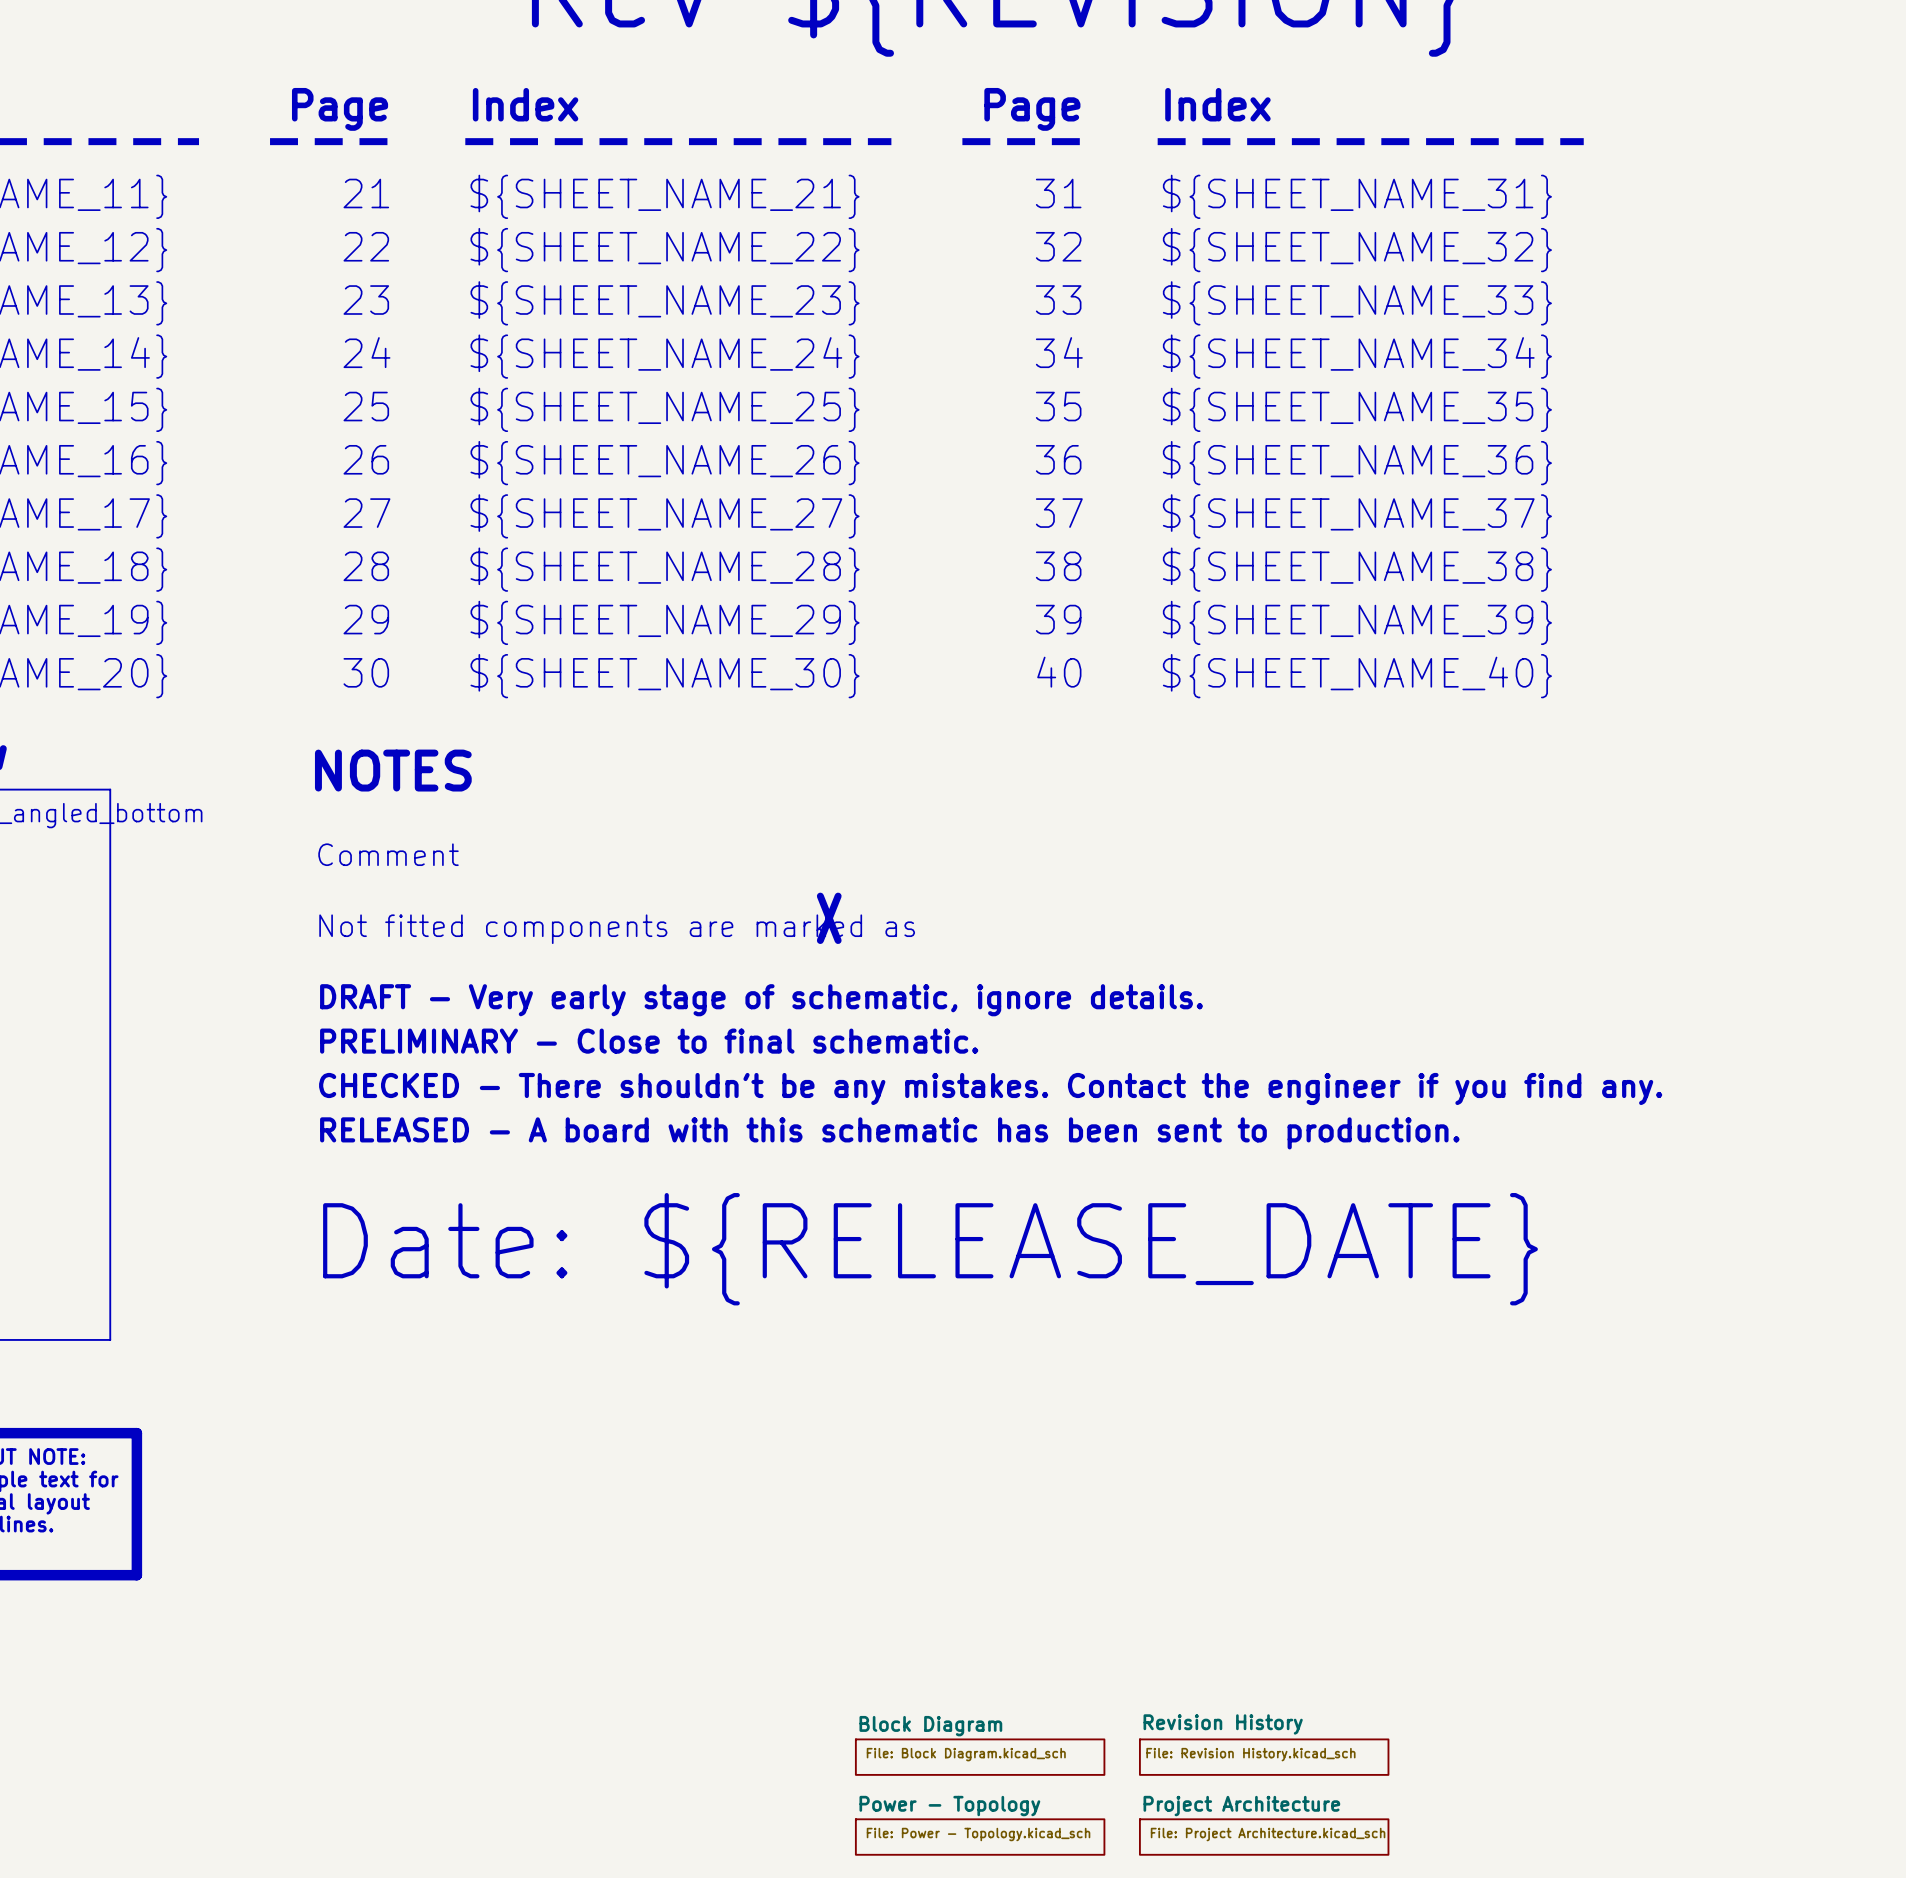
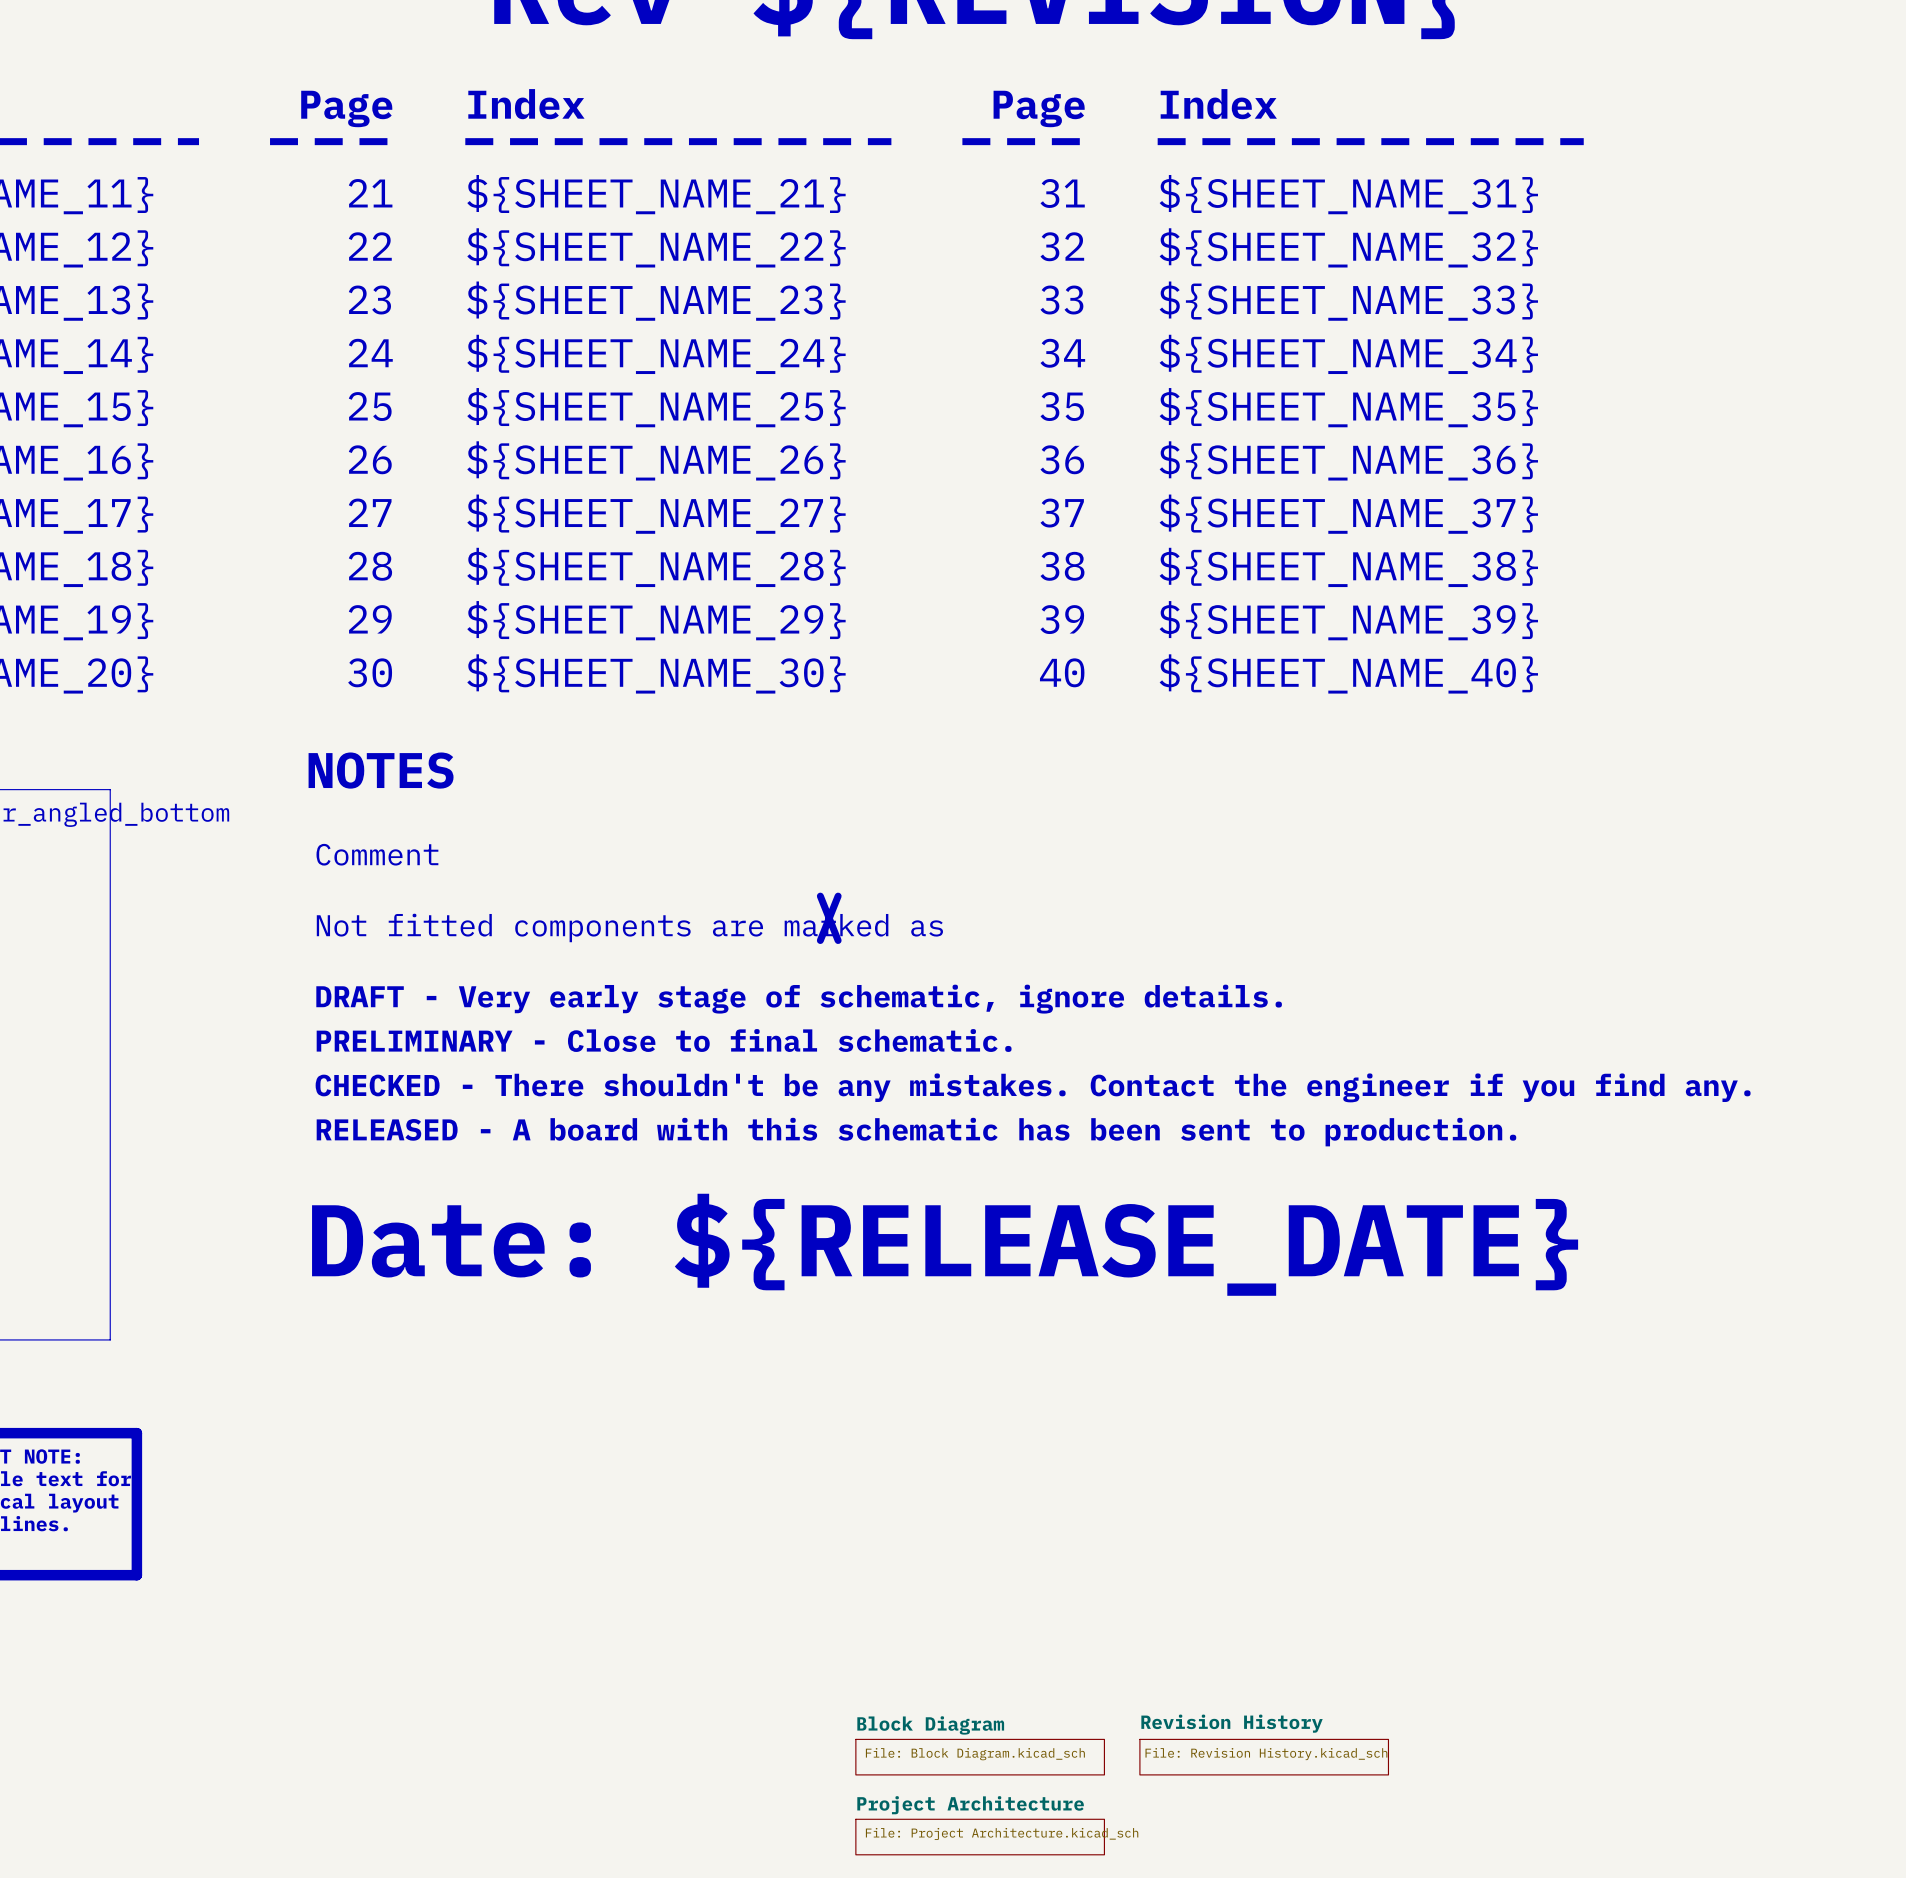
sheet Power - Topology name: Power - Topology (949, 1806) -> Project Architecture (970, 1805)
sheet Power - Topology value: File: Power - Topology.kicad_sch (978, 1834) -> File: Project Architecture.kicad_sch (1002, 1833)
sheet Project Architecture: File: Project Architecture.kicad_sch (1264, 1837) -> none

